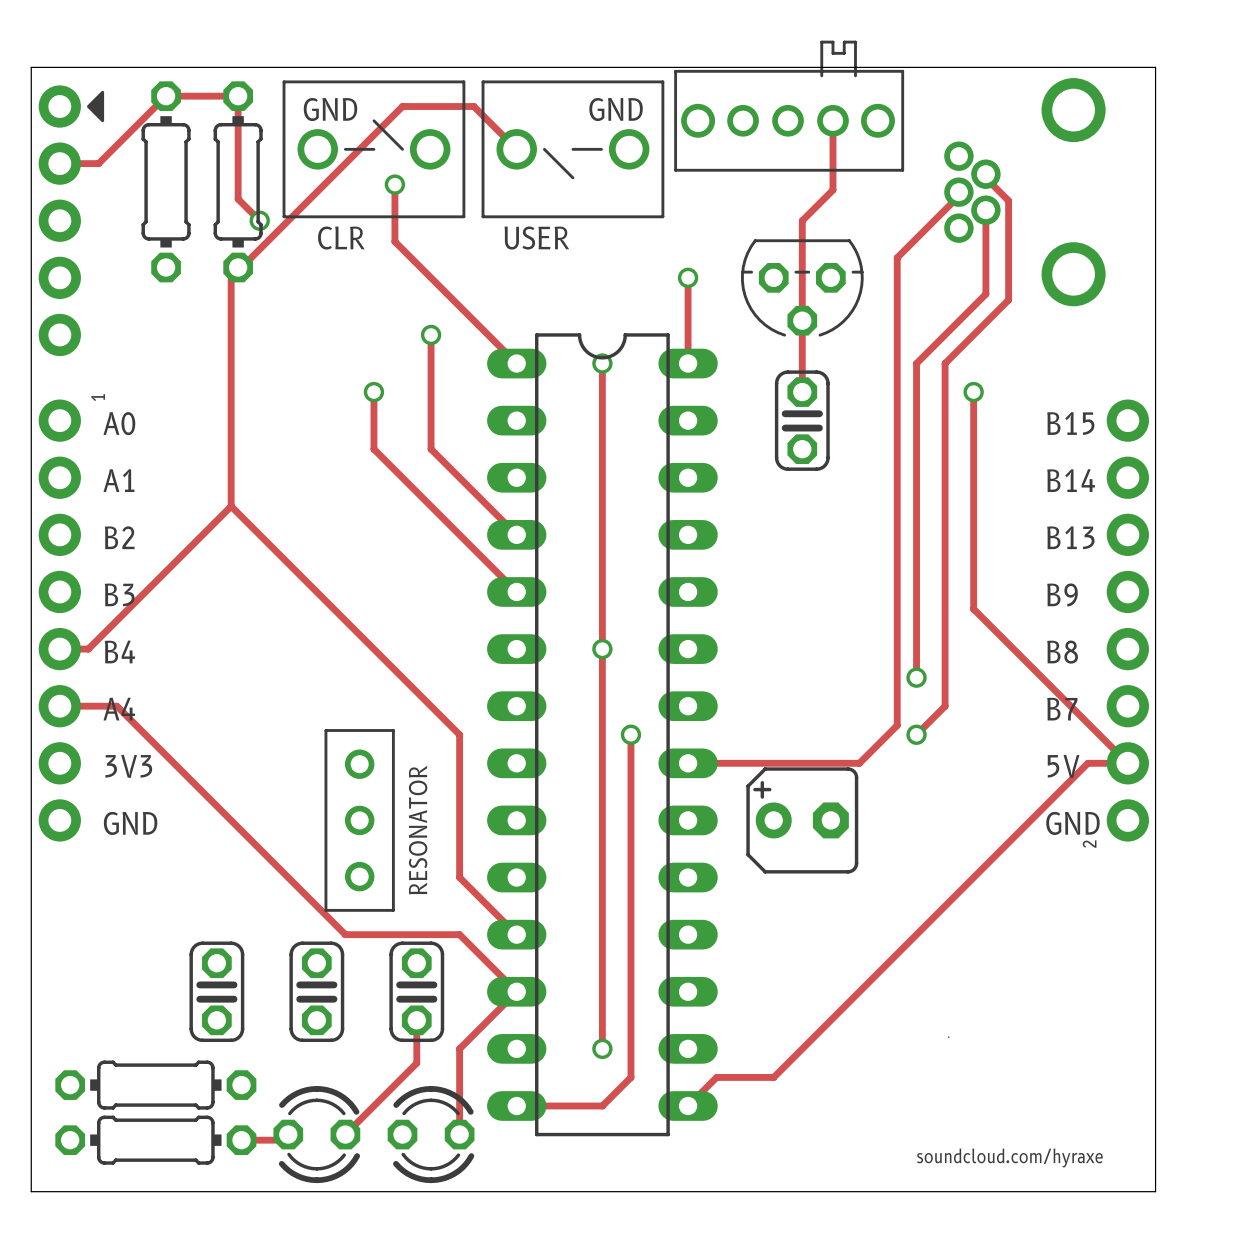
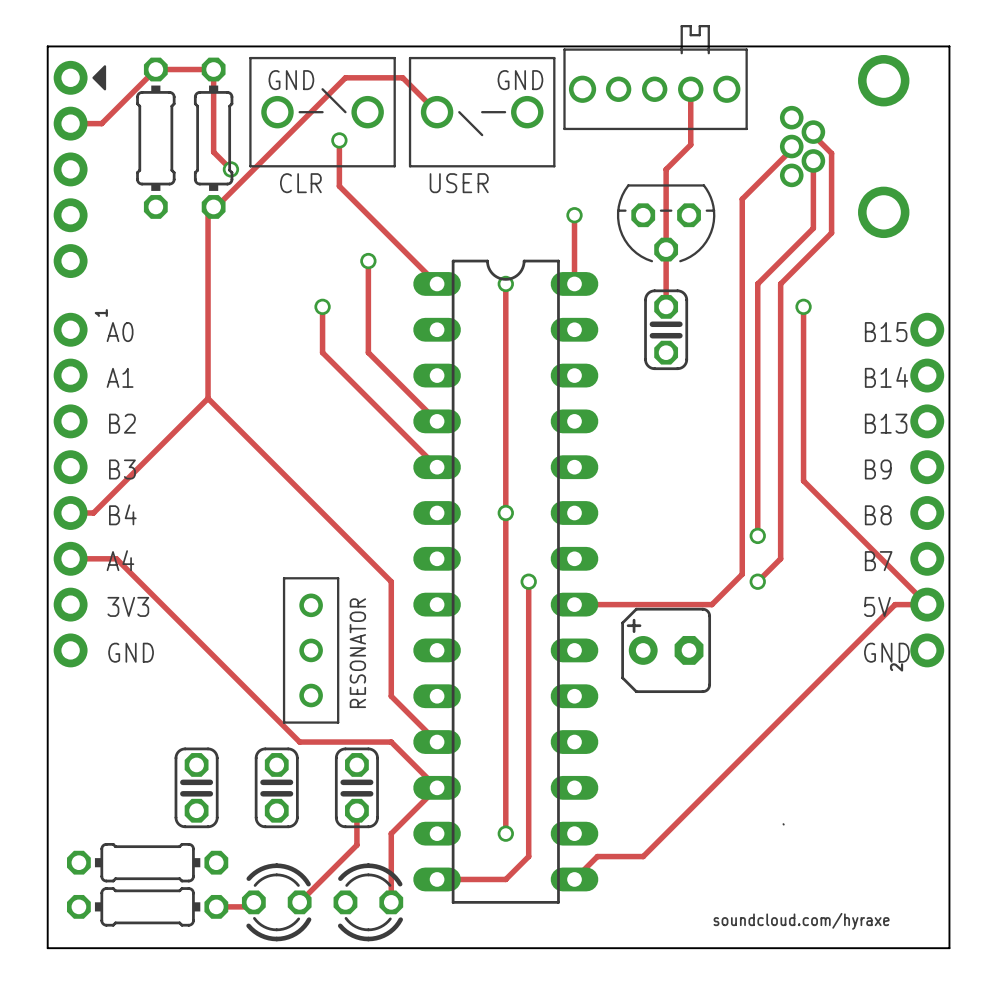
text position: soundcloud.com/hyraxe (1009, 1157) -> soundcloud.com/hyraxe (801, 921)

